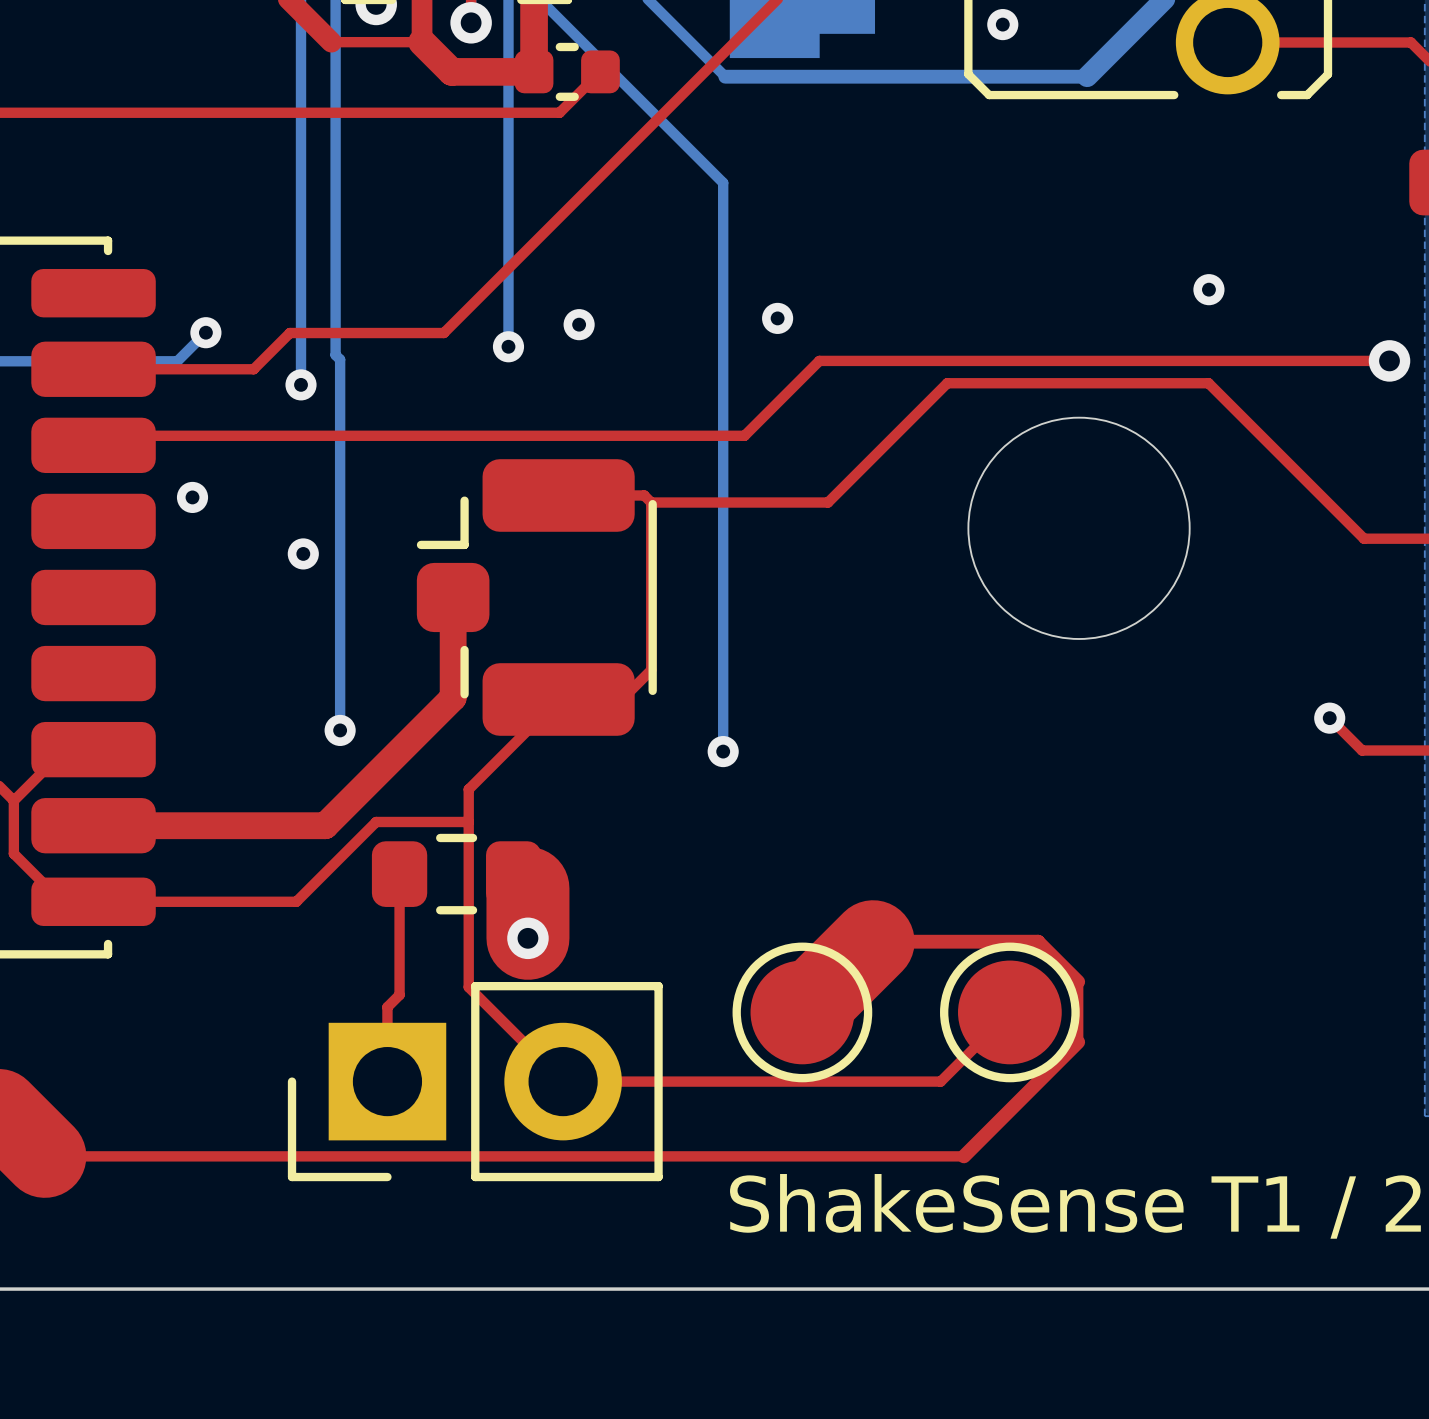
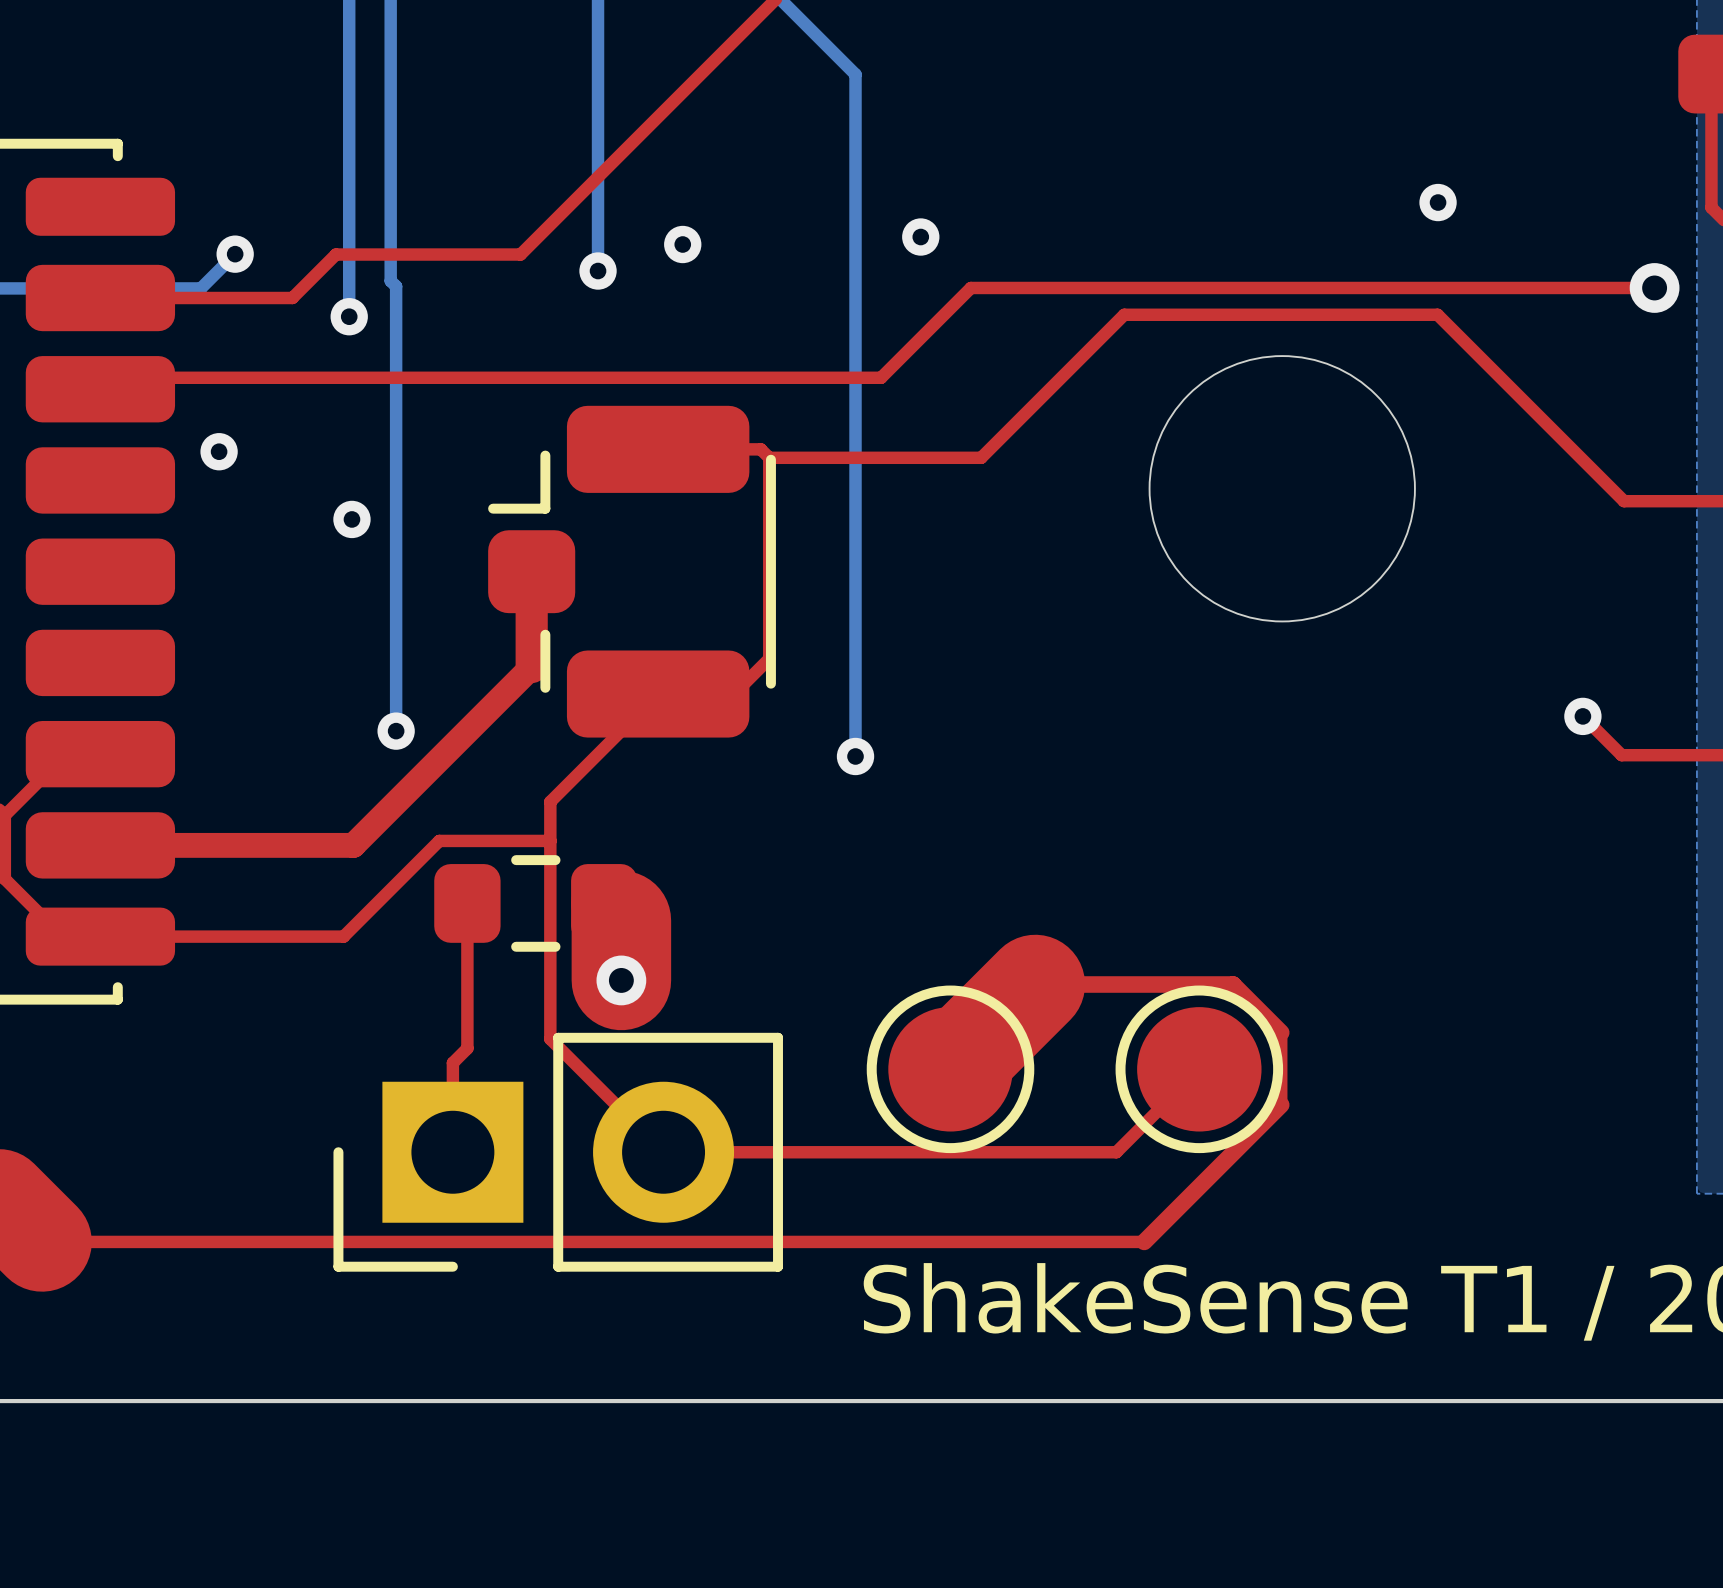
top track: (453, 677) (453, 697) (325, 825) (304, 825) -> (531, 667) (353, 845)
top track width: thick (93, 825) (304, 825) -> thin (100, 845) (353, 845)

